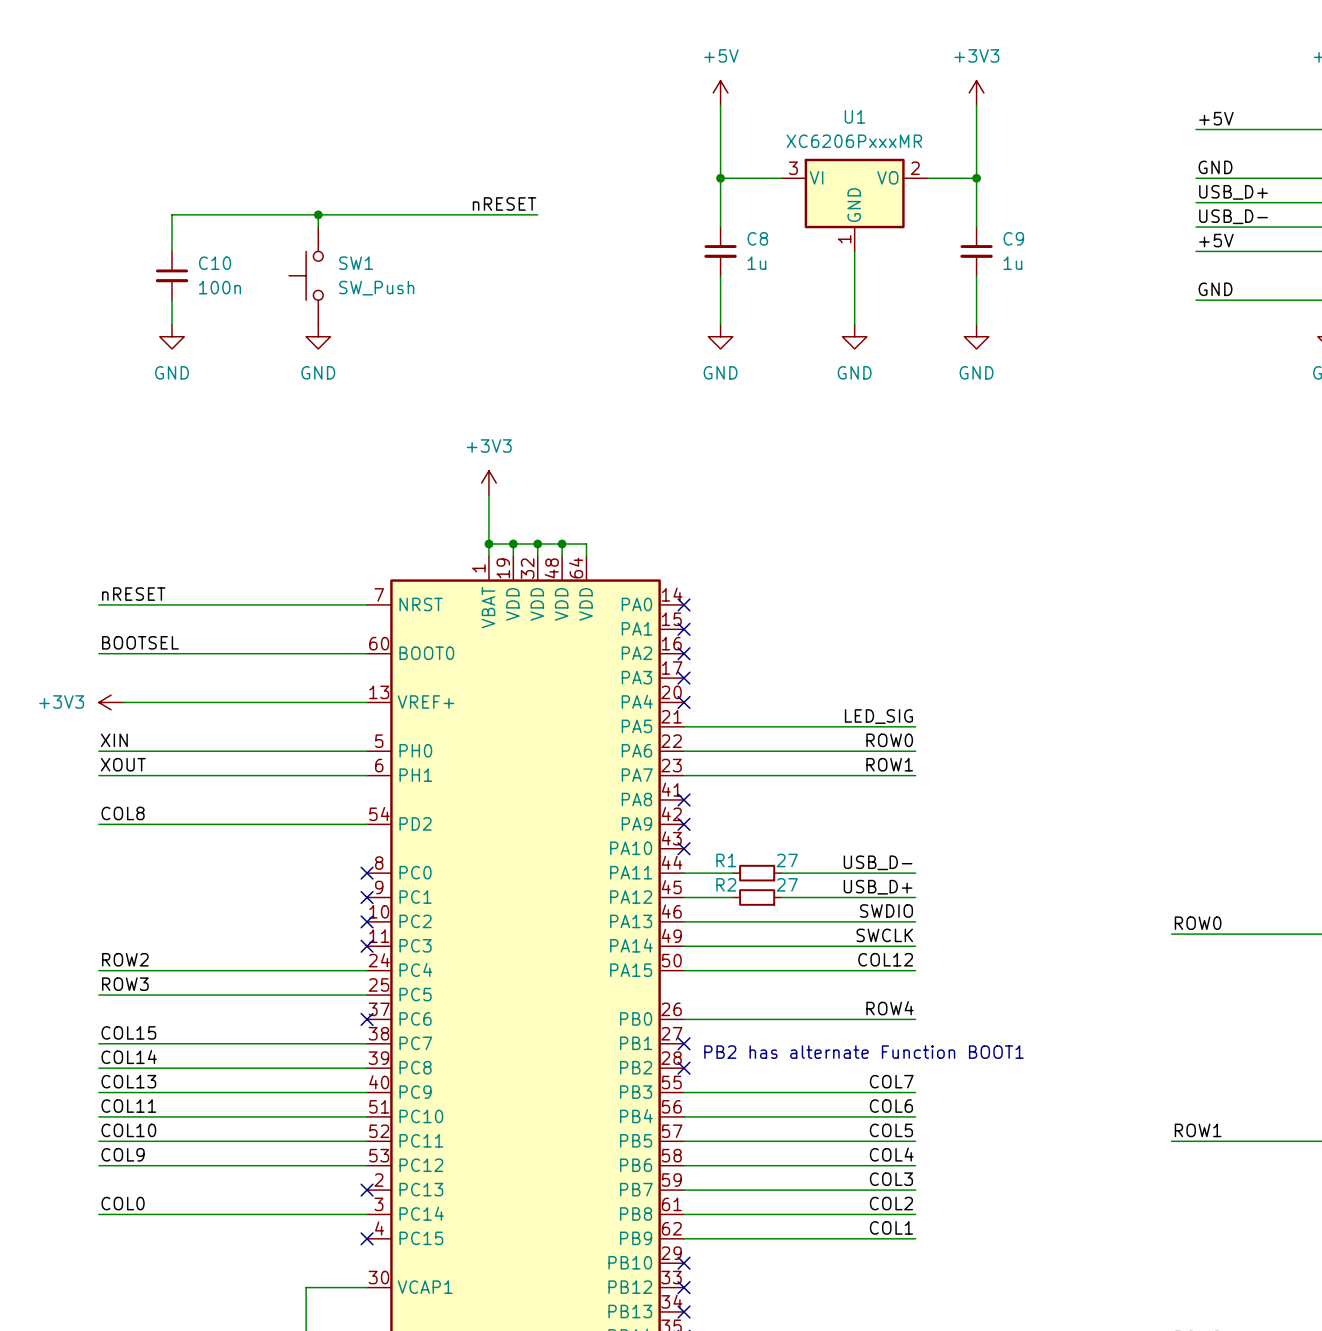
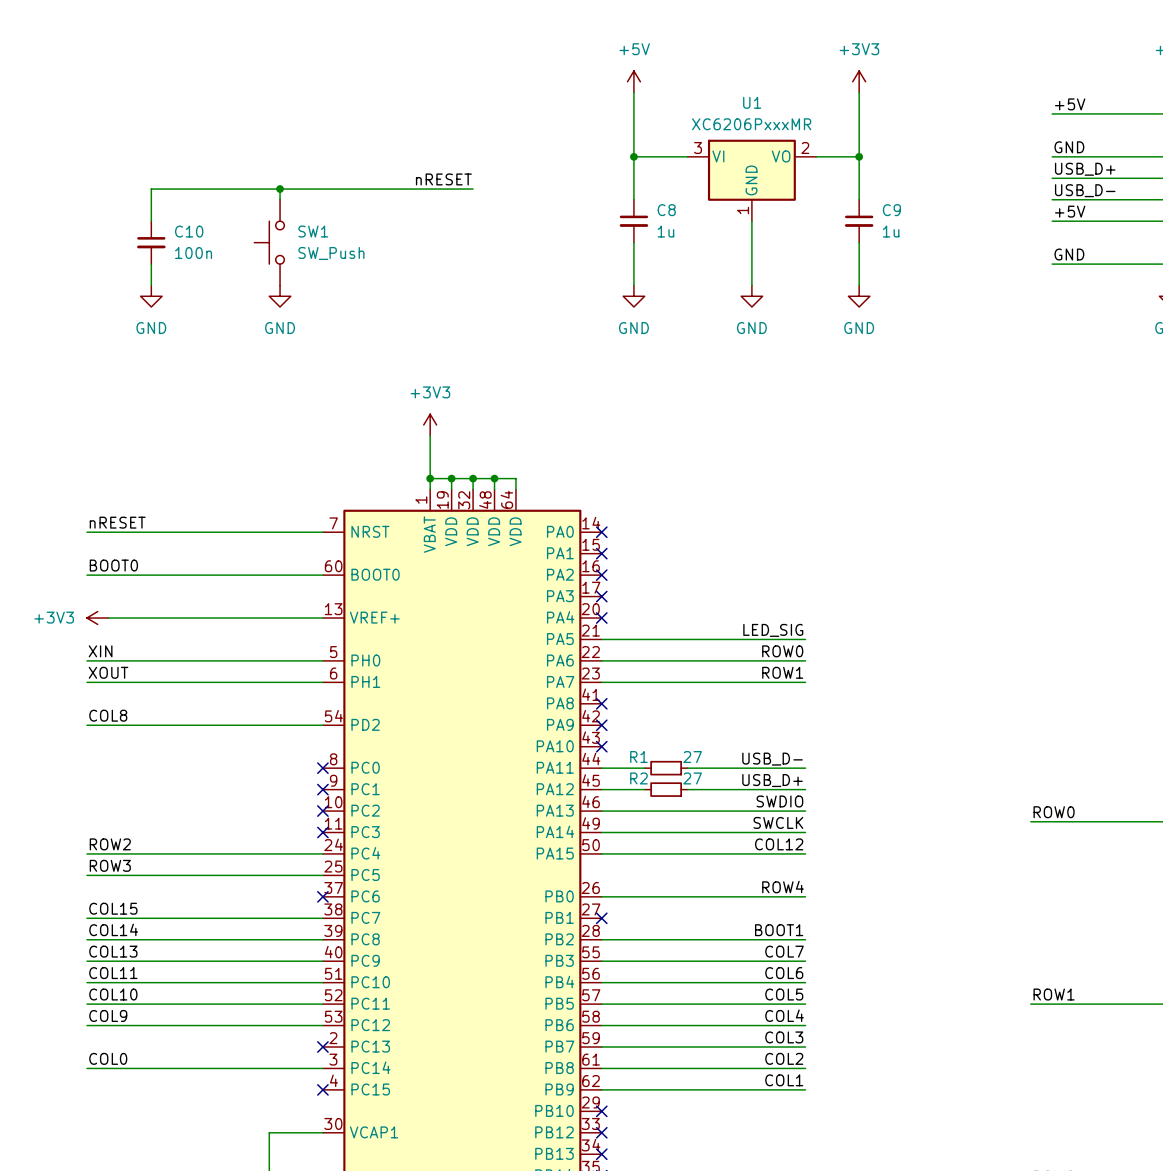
label: BOOTSEL (140, 642) -> BOOT0 (113, 565)
text: PB2 has alternate Function BOOT1 (863, 1052) -> none
label: none -> BOOT1 (779, 930)
wire: none -> (601, 939) (805, 939)
no-connect mark: (684, 1068) -> none

